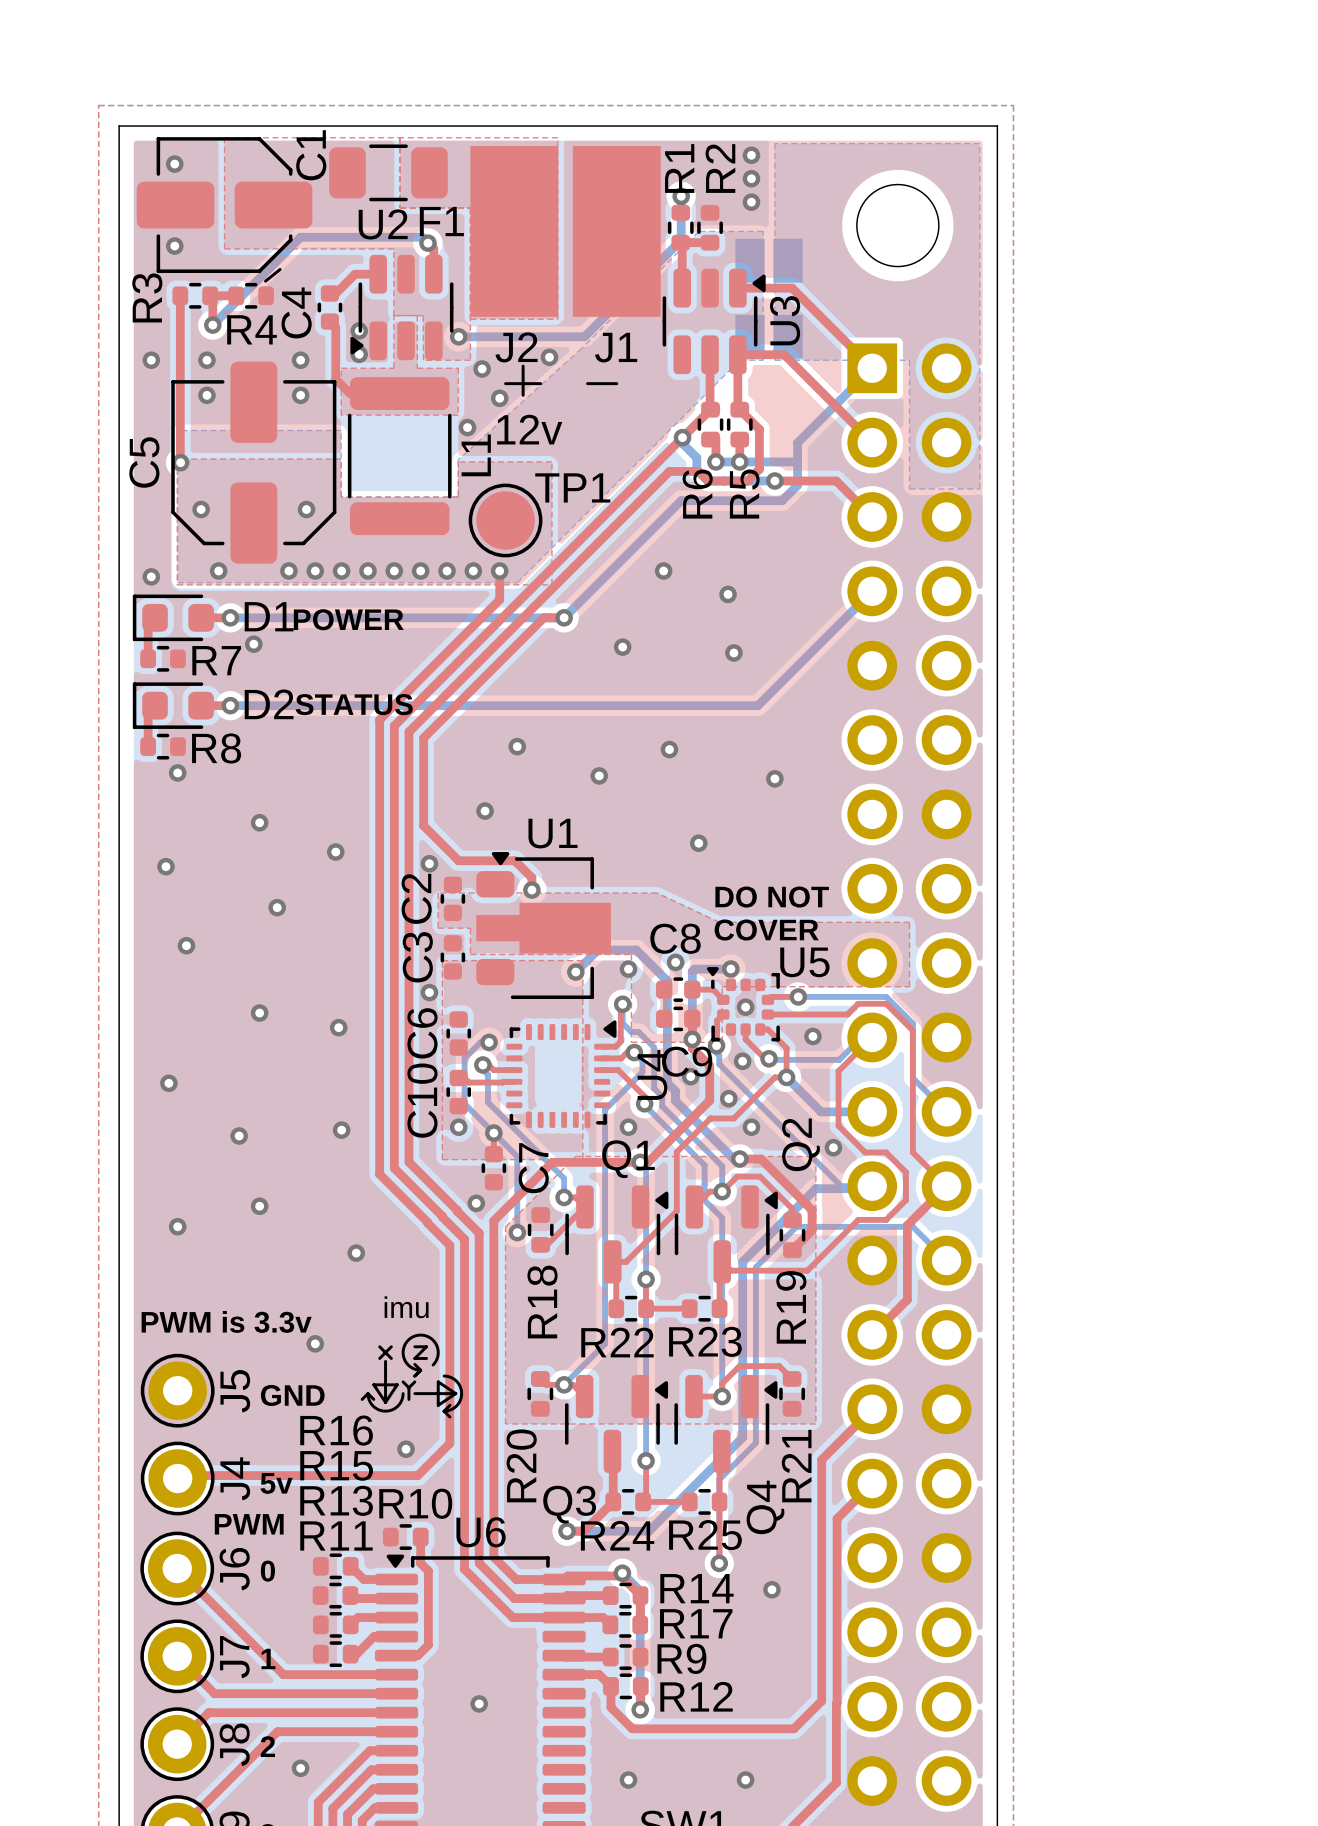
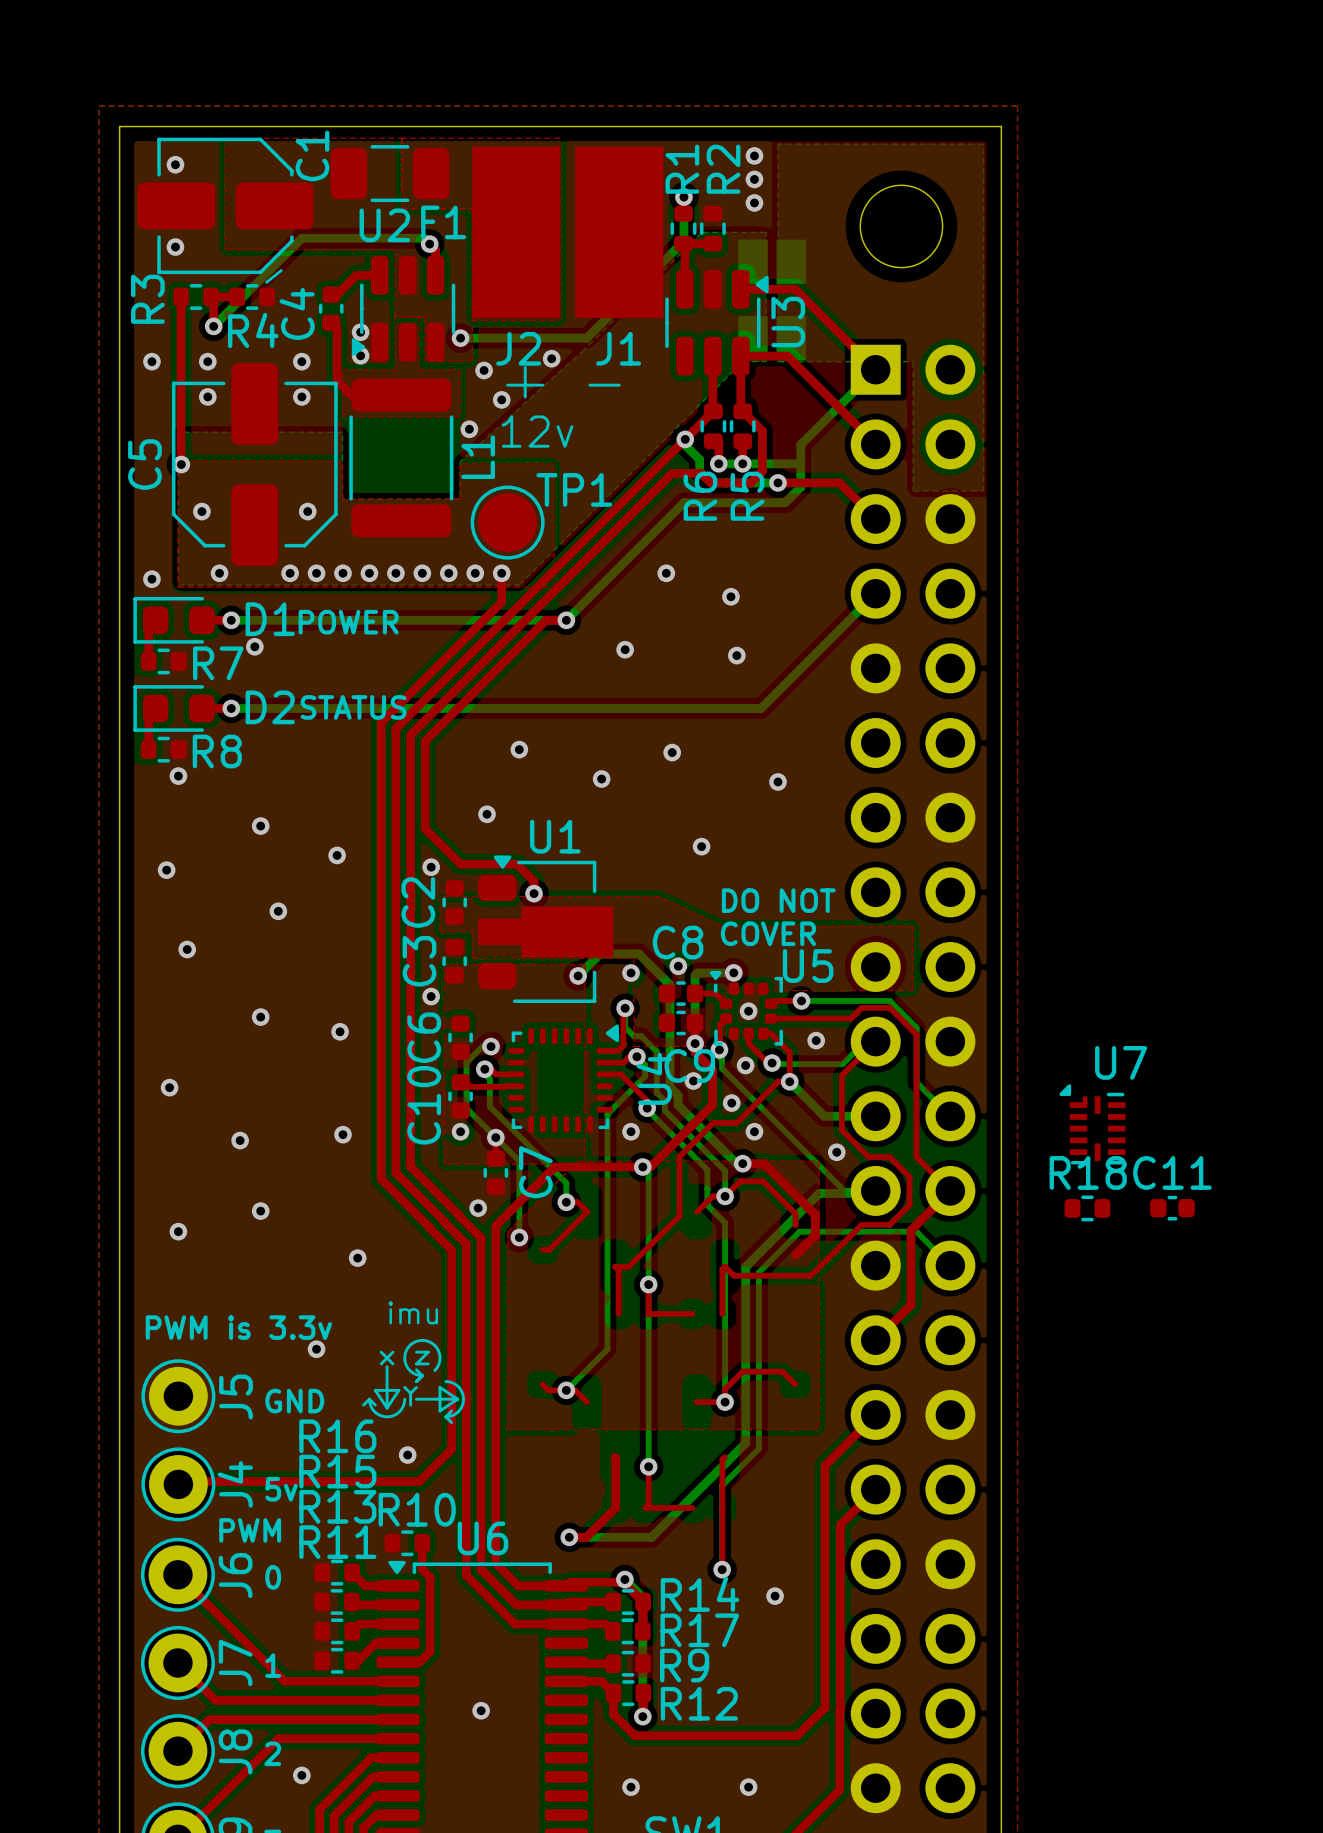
U7: none -> (1092, 1124)
C11: none -> (1172, 1208)
R18 rotation: 0° (540, 1229) -> 90° clockwise (1087, 1208)
R18 position: (540, 1229) -> (1087, 1208)
Q1: (616, 1234) -> none
Q2: (726, 1234) -> none
R19: (792, 1235) -> none
R18 name position: R18 (542, 1302) -> R18 (1088, 1172)
R22: (631, 1308) -> none
R23: (704, 1308) -> none
R20: (540, 1393) -> none
R21: (792, 1393) -> none
Q3: (616, 1423) -> none
Q4: (725, 1423) -> none
R24: (628, 1501) -> none
R25: (704, 1501) -> none

